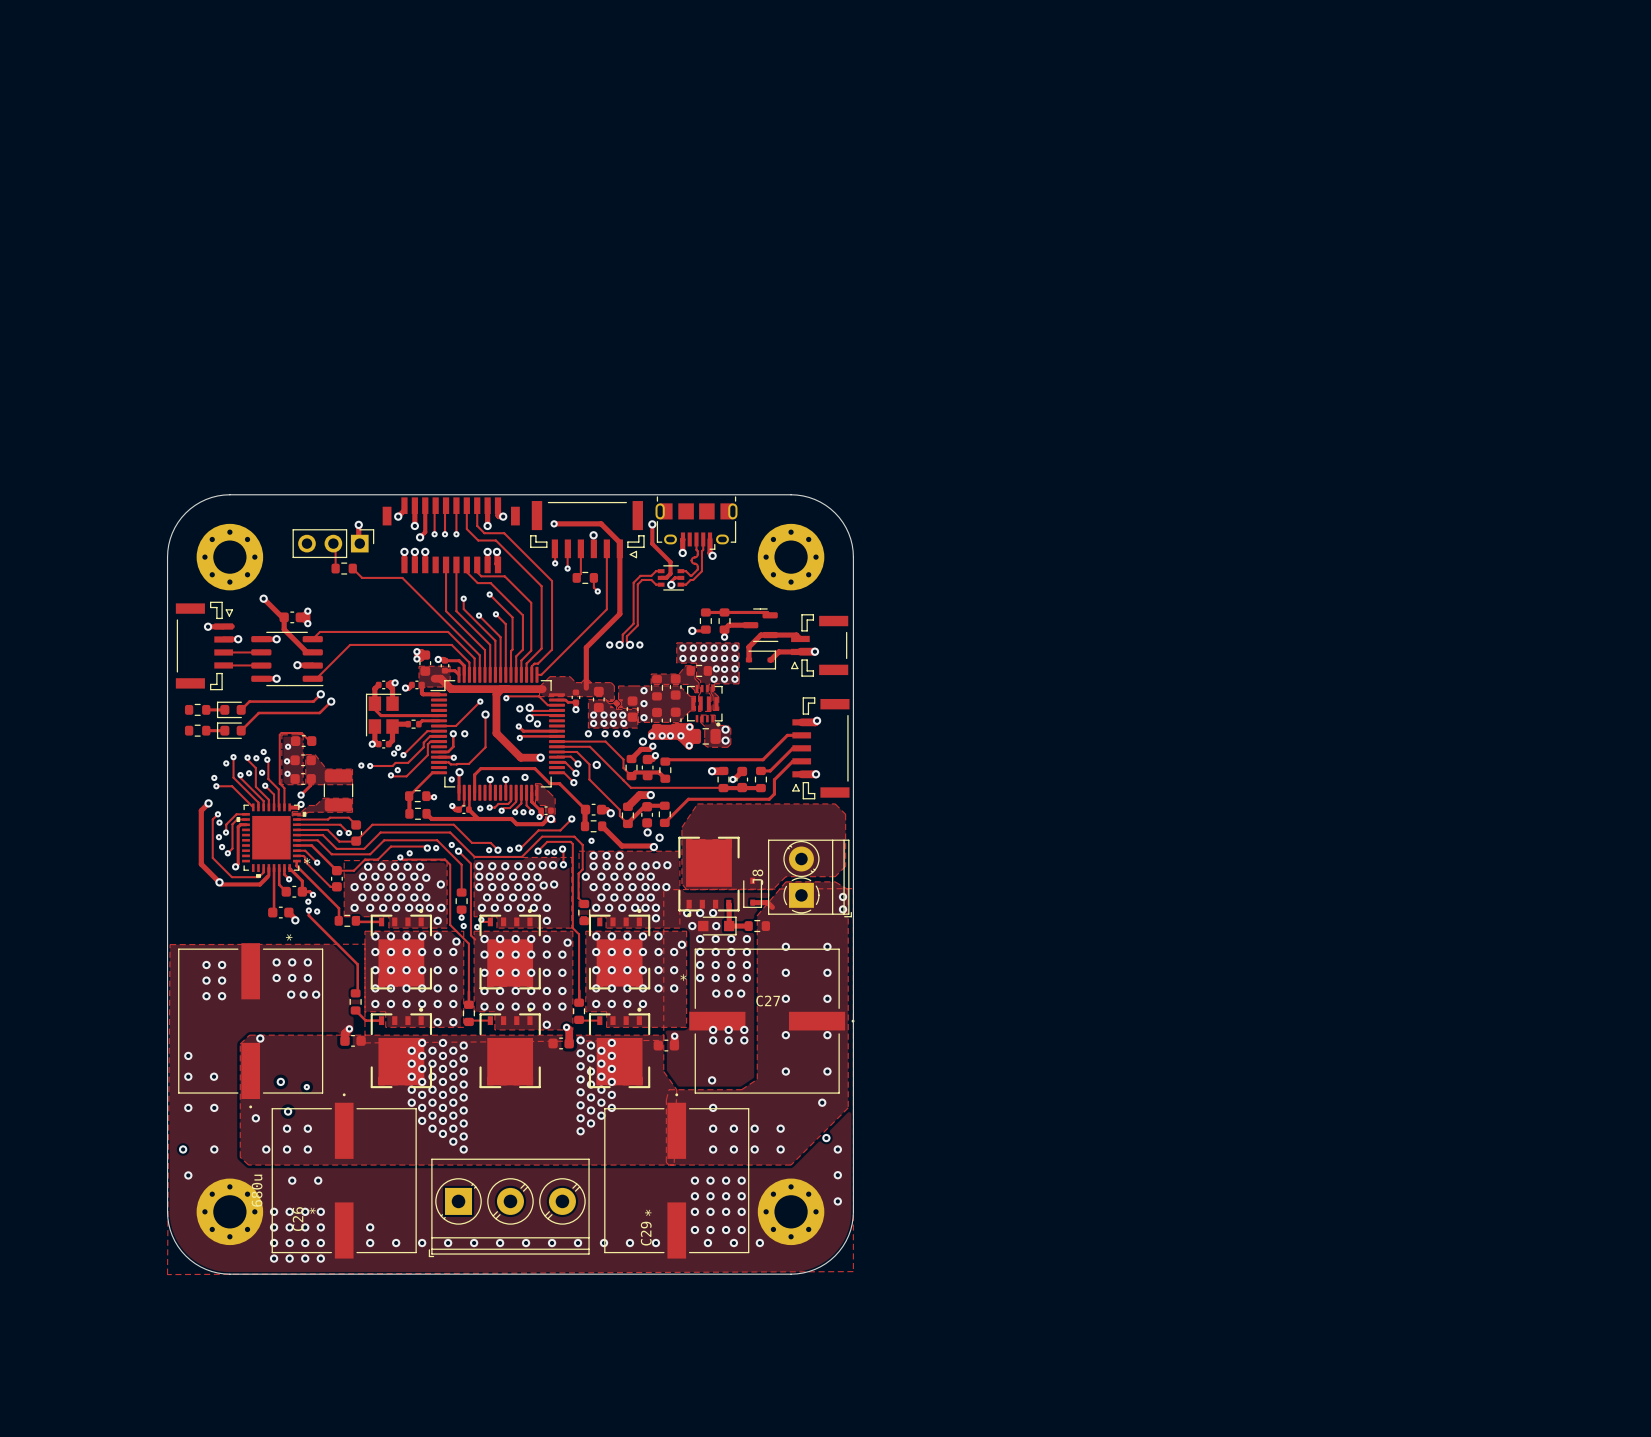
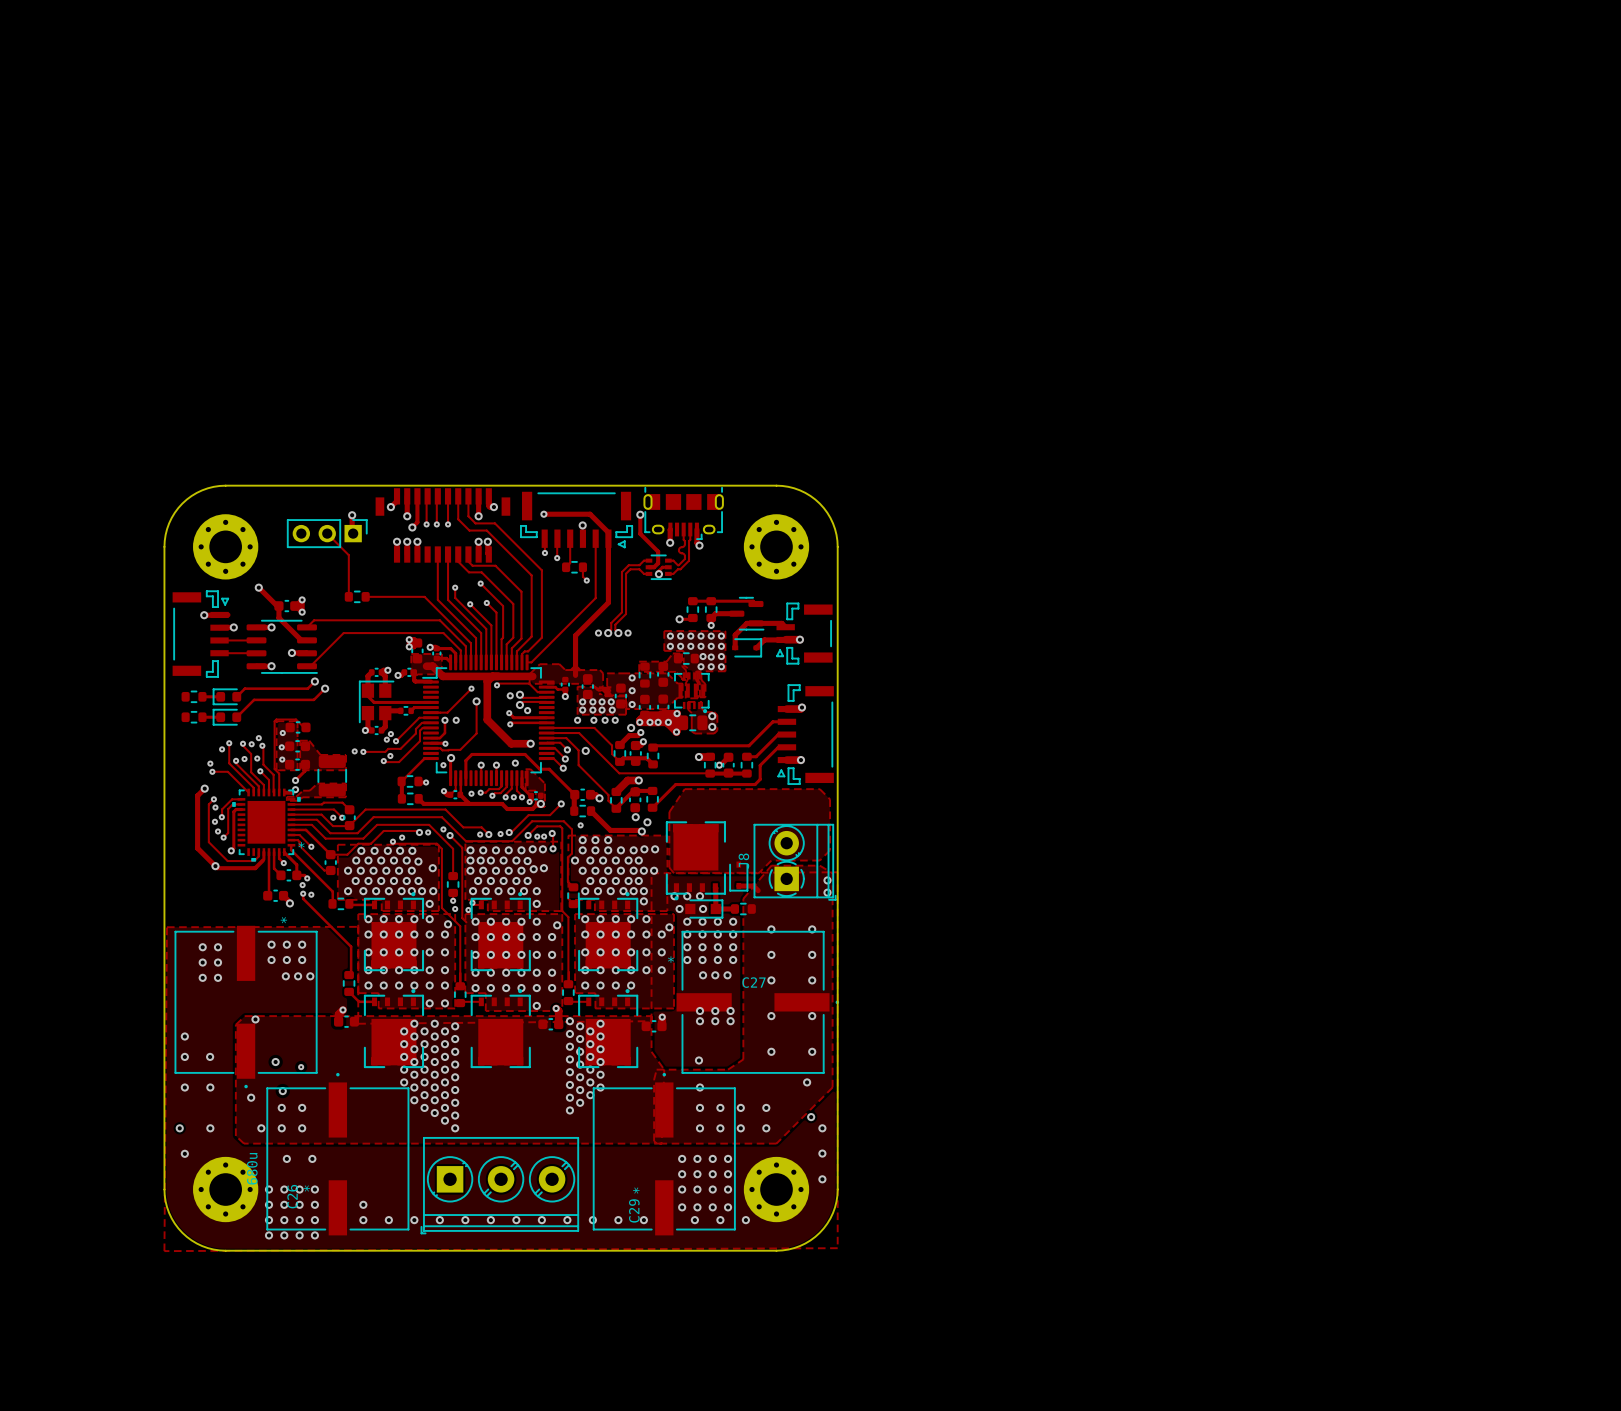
track: (335, 545) (335, 568) -> (329, 535) (348, 555) (348, 596)
part position: (344, 568) -> (357, 596)
track: (352, 568) (362, 577) (402, 577) (432, 608) -> (365, 596) (424, 596)

